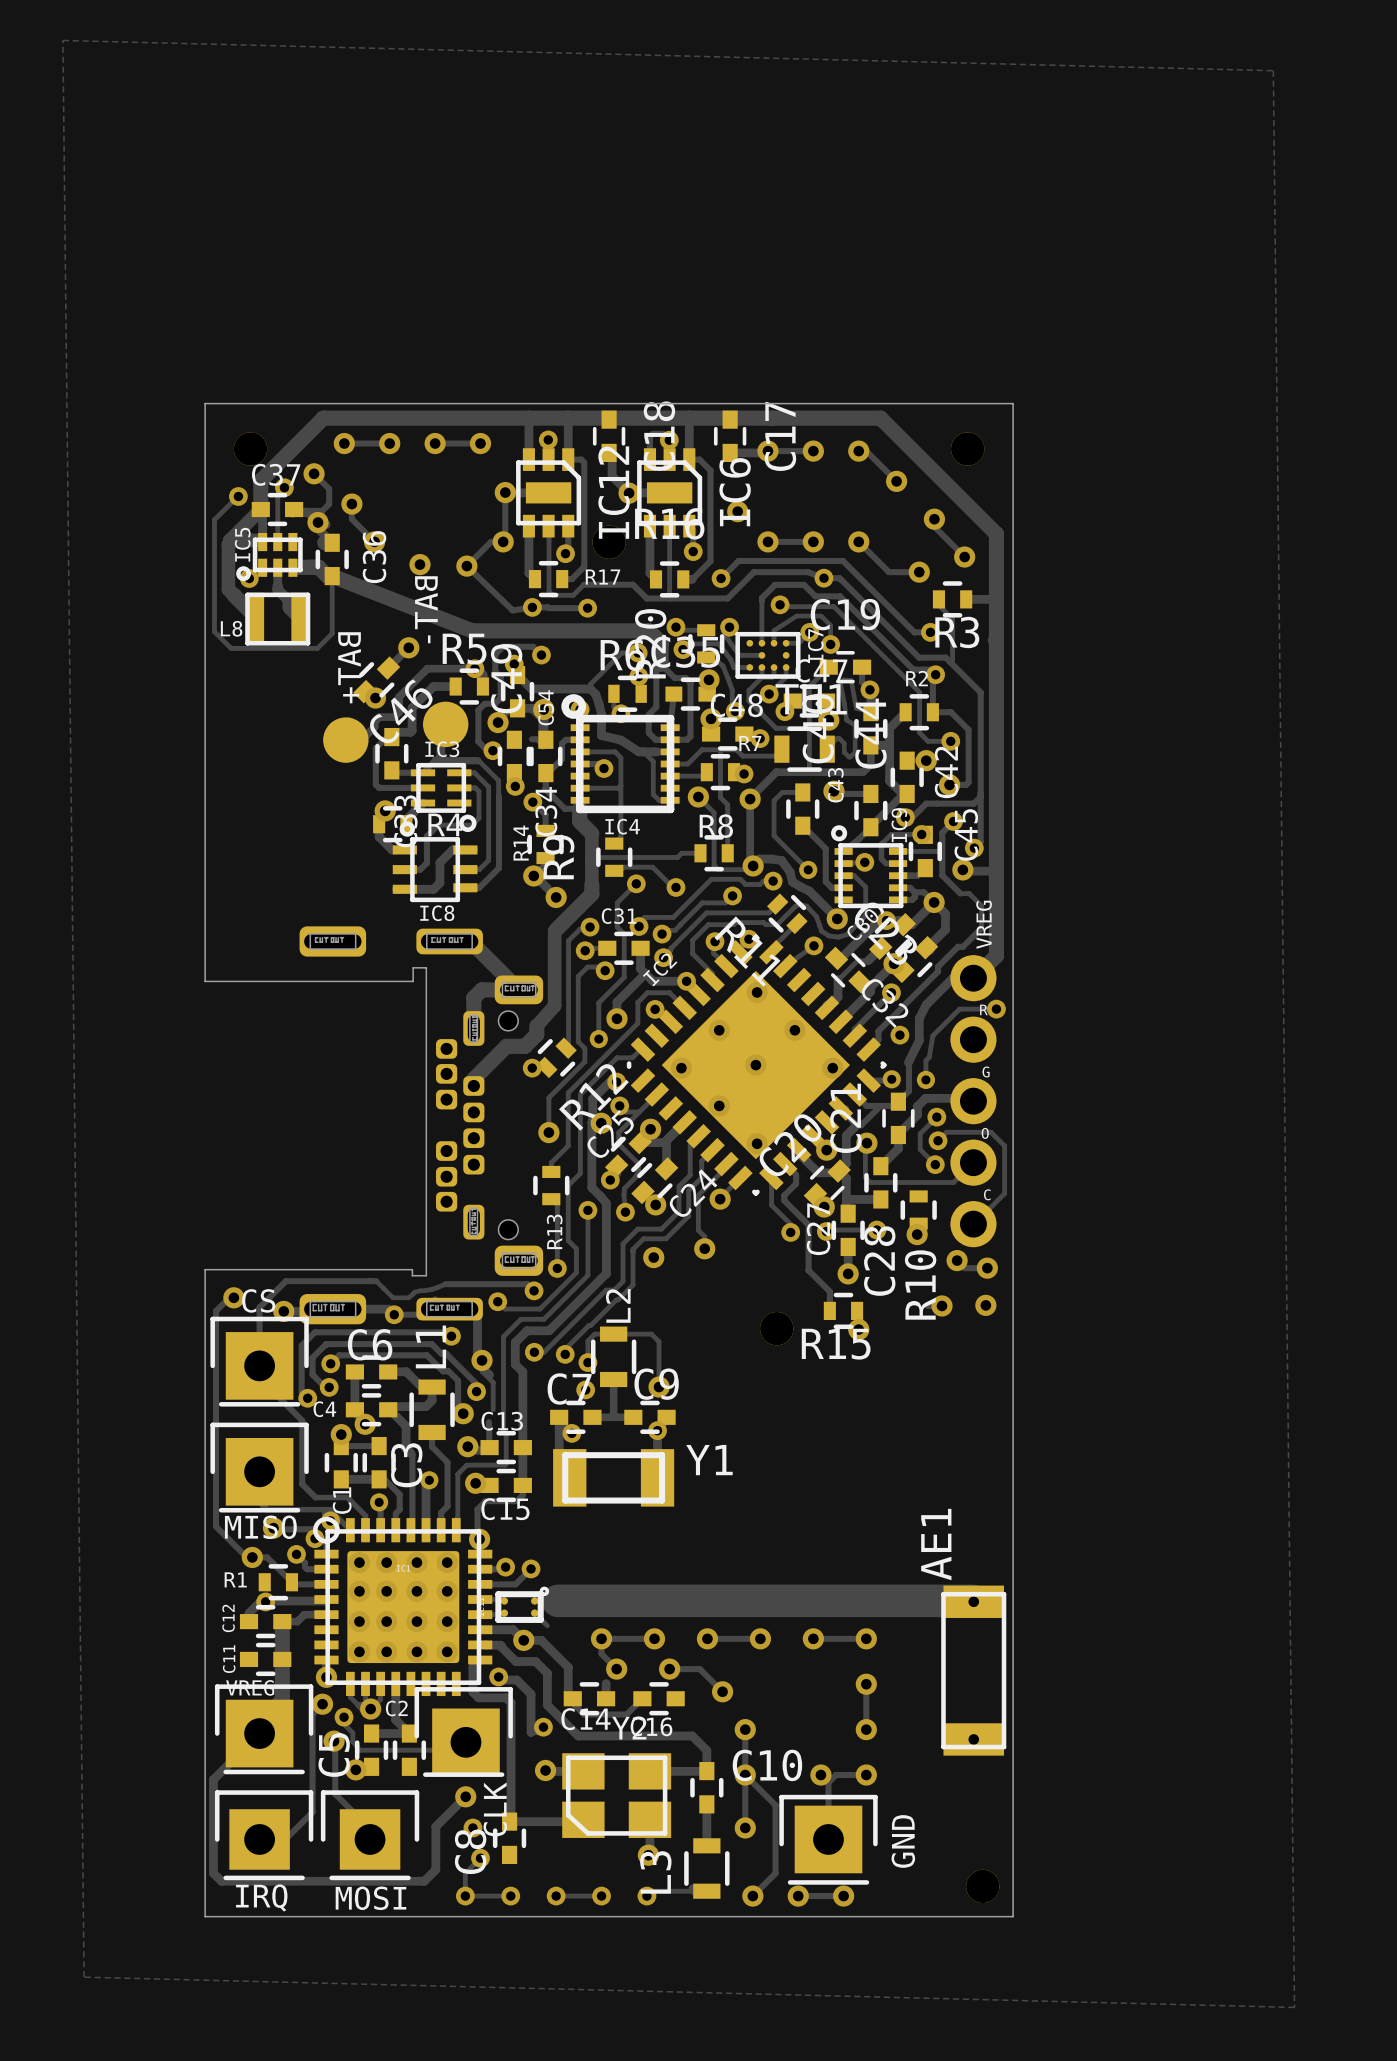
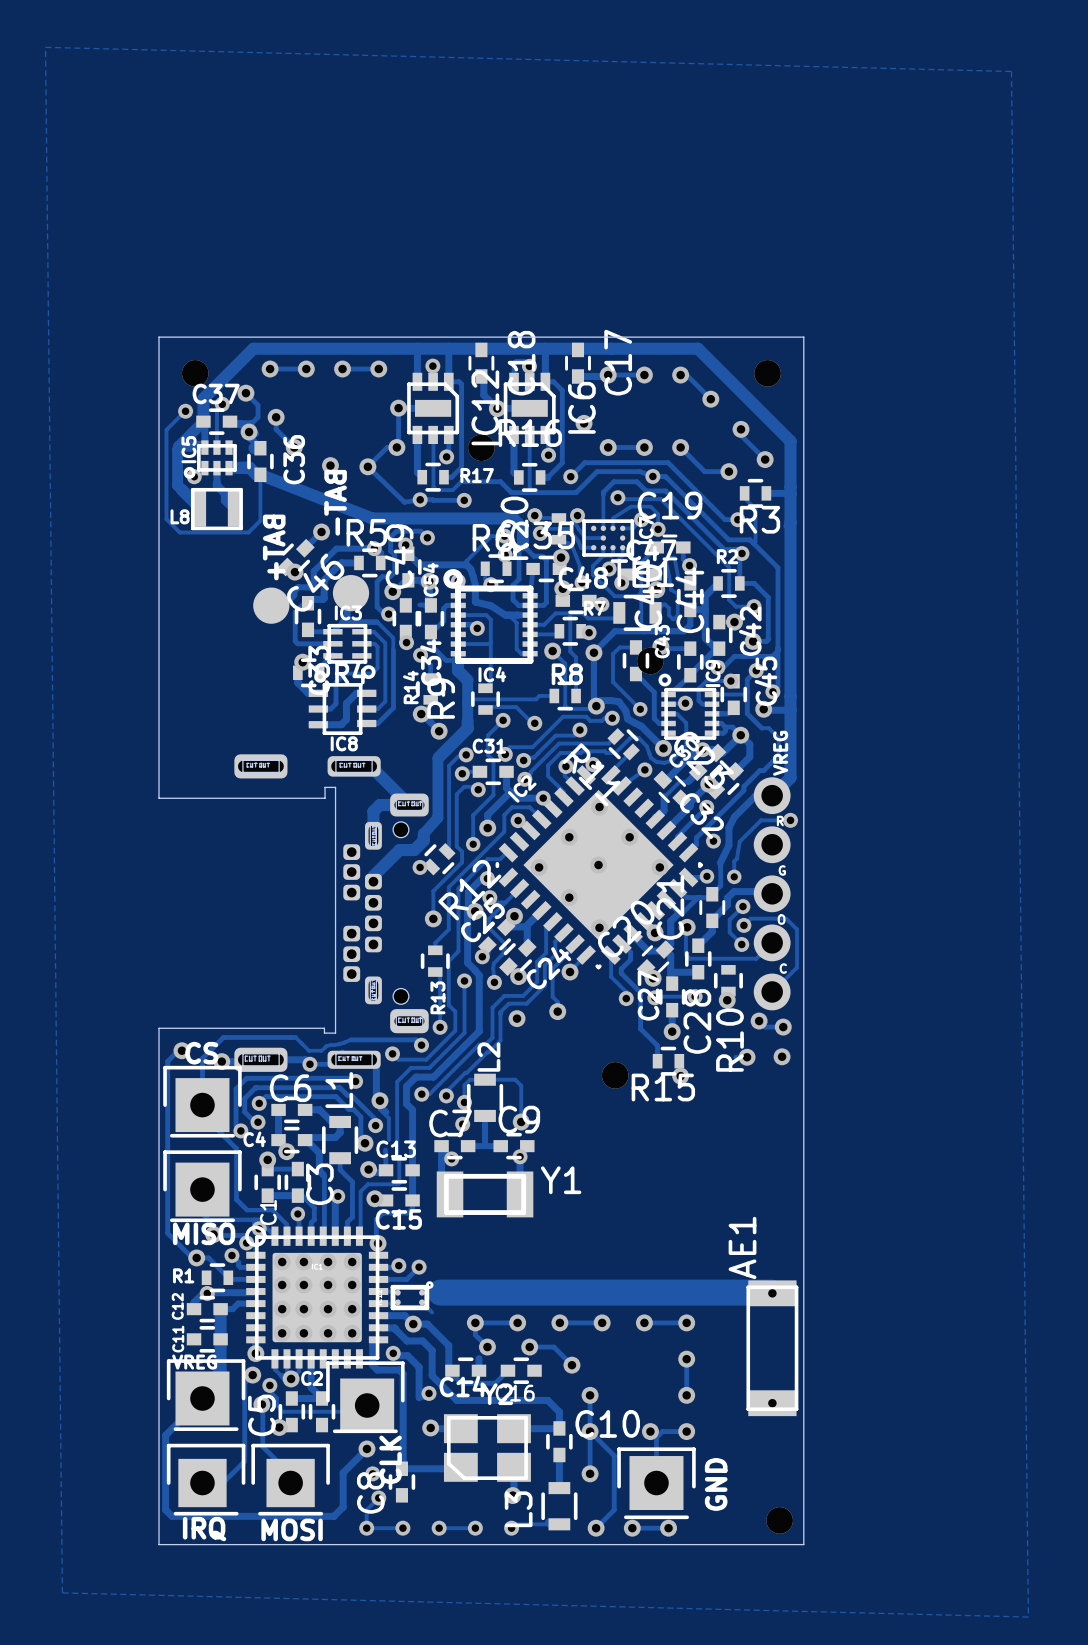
part: none -> (650, 660)

